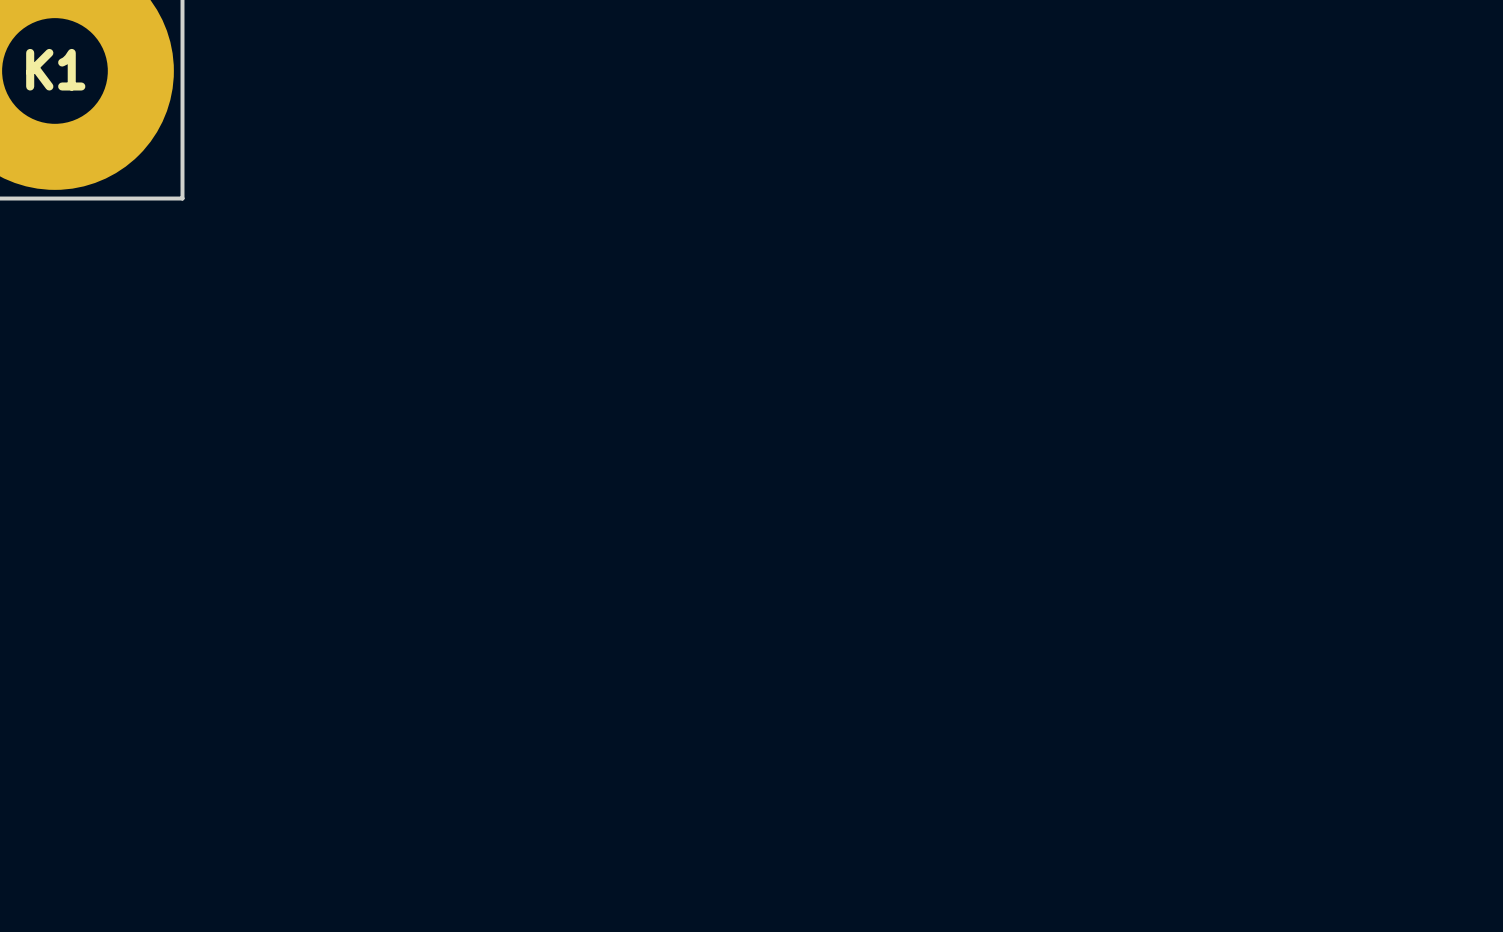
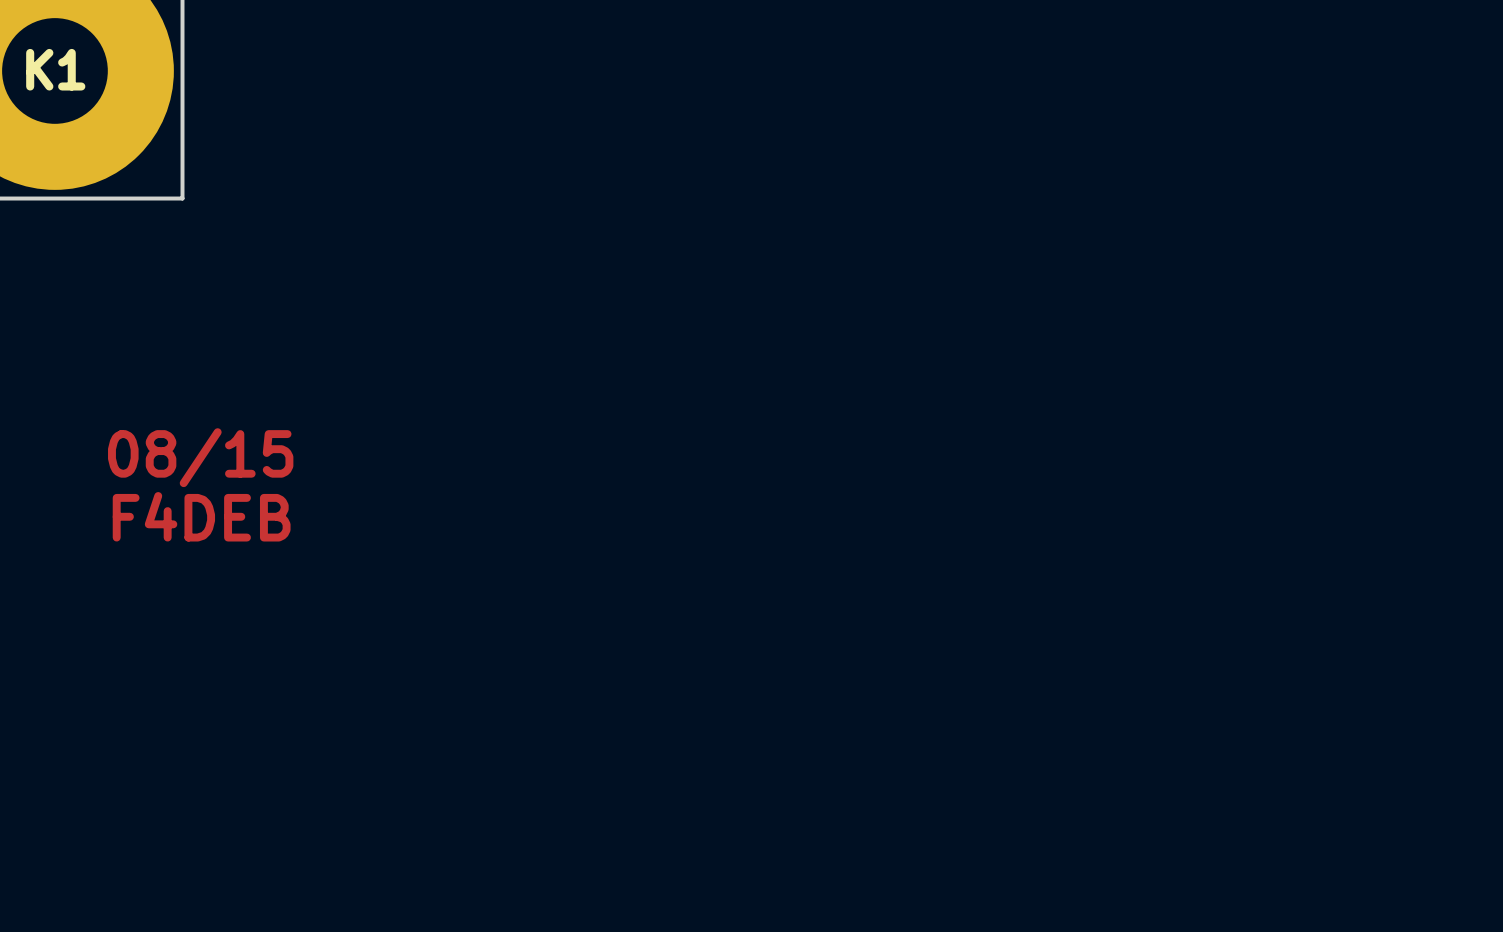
text: none -> 08/15 (200, 457)
text: none -> F4DEB (201, 516)

